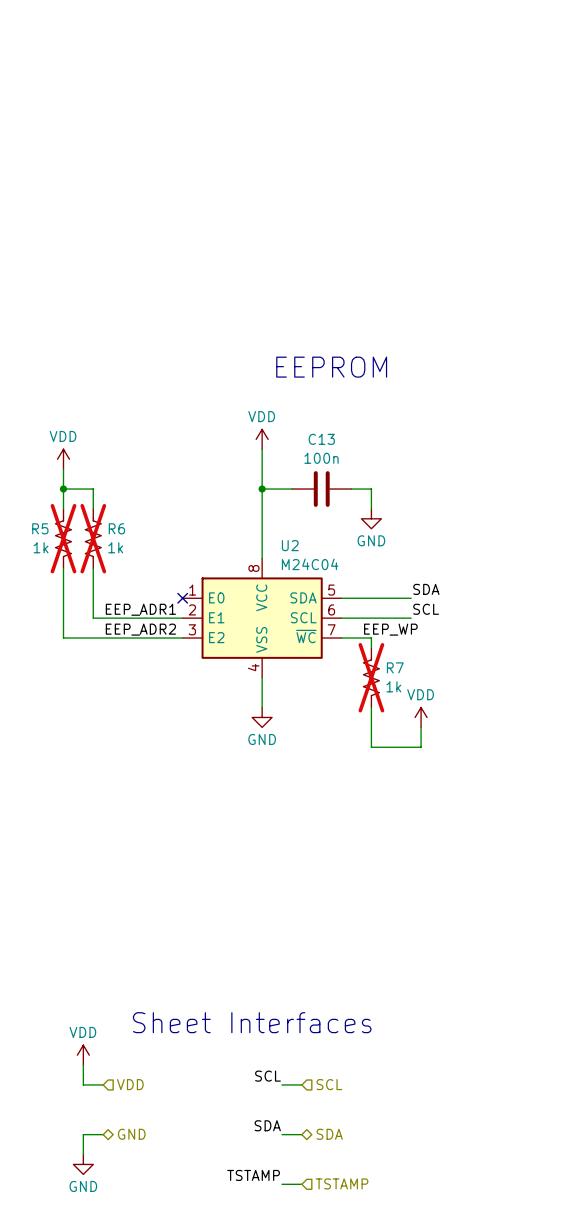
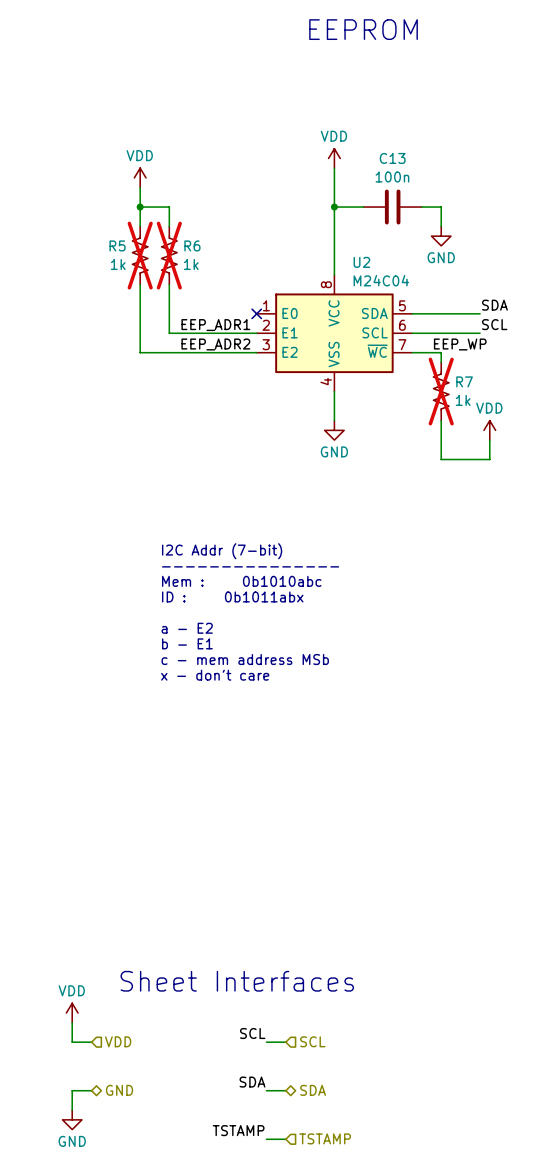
text: none -> EEPROM (363, 29)
power symbol: none -> VDD (334, 158)
wire: none -> (334, 168) (334, 275)
power symbol: none -> VDD (140, 177)
wire: none -> (140, 187) (140, 226)
wire: none -> (140, 207) (169, 207) (169, 226)
junction: none -> (140, 207)
wire: none -> (334, 207) (363, 207)
junction: none -> (334, 207)
wire: none -> (421, 207) (441, 207) (441, 226)
power symbol: none -> GND (441, 236)
wire: none -> (140, 284) (140, 352) (256, 352)
wire: none -> (169, 284) (169, 333) (256, 333)
label: none -> SDA (494, 305)
no-connect mark: none -> (256, 313)
wire: none -> (412, 313) (480, 313)
label: none -> EEP_ADR1 (215, 325)
label: none -> SCL (494, 324)
wire: none -> (412, 333) (480, 333)
text: EEPROM (331, 367) -> none
label: none -> EEP_ADR2 (215, 344)
label: none -> EEP_WP (460, 344)
wire: none -> (412, 352) (441, 352) (441, 362)
wire: none -> (334, 391) (334, 420)
power symbol: VDD (262, 439) -> none
wire: (262, 449) (262, 558) -> none
wire: none -> (441, 420) (441, 459) (489, 459) (489, 440)
power symbol: VDD (63, 459) -> none
power symbol: none -> VDD (489, 430)
wire: (63, 469) (63, 508) -> none
wire: (63, 489) (93, 489) (93, 508) -> none
junction: (63, 489) -> none
wire: (262, 489) (291, 489) -> none
junction: (262, 489) -> none
C13 position: (321, 489) -> (392, 207)
wire: (351, 489) (371, 489) (371, 508) -> none
power symbol position: GND (371, 518) -> GND (334, 430)
R5 position: (63, 538) -> (140, 255)
R6 position: (93, 538) -> (169, 255)
wire: (63, 568) (63, 638) (182, 638) -> none
wire: (93, 568) (93, 618) (182, 618) -> none
text: none -> I2C Addr (7-bit) (222, 551)
label: SDA (426, 589) -> none
no-connect mark: (182, 598) -> none
text: none -> --------------- (250, 566)
wire: (341, 598) (411, 598) -> none
label: EEP_ADR1 (140, 609) -> none
label: SCL (426, 609) -> none
text: none -> Mem : 0b1010abc (241, 581)
U2 position: (262, 618) -> (334, 333)
wire: (341, 618) (411, 618) -> none
label: EEP_ADR2 (140, 629) -> none
text: none -> ID : 0b1011abx (232, 596)
label: EEP_WP (390, 629) -> none
wire: (341, 638) (371, 638) (371, 647) -> none
text: none -> a - E2 (187, 628)
text: none -> b - E1 (187, 643)
wire: (262, 677) (262, 707) -> none
R7 position: (371, 677) -> (441, 391)
text: none -> c - mem address MSb (245, 659)
wire: (371, 707) (371, 747) (421, 747) (421, 727) -> none
text: none -> x - don't care (215, 675)
power symbol: GND (262, 717) -> none
power symbol: VDD (421, 717) -> none

